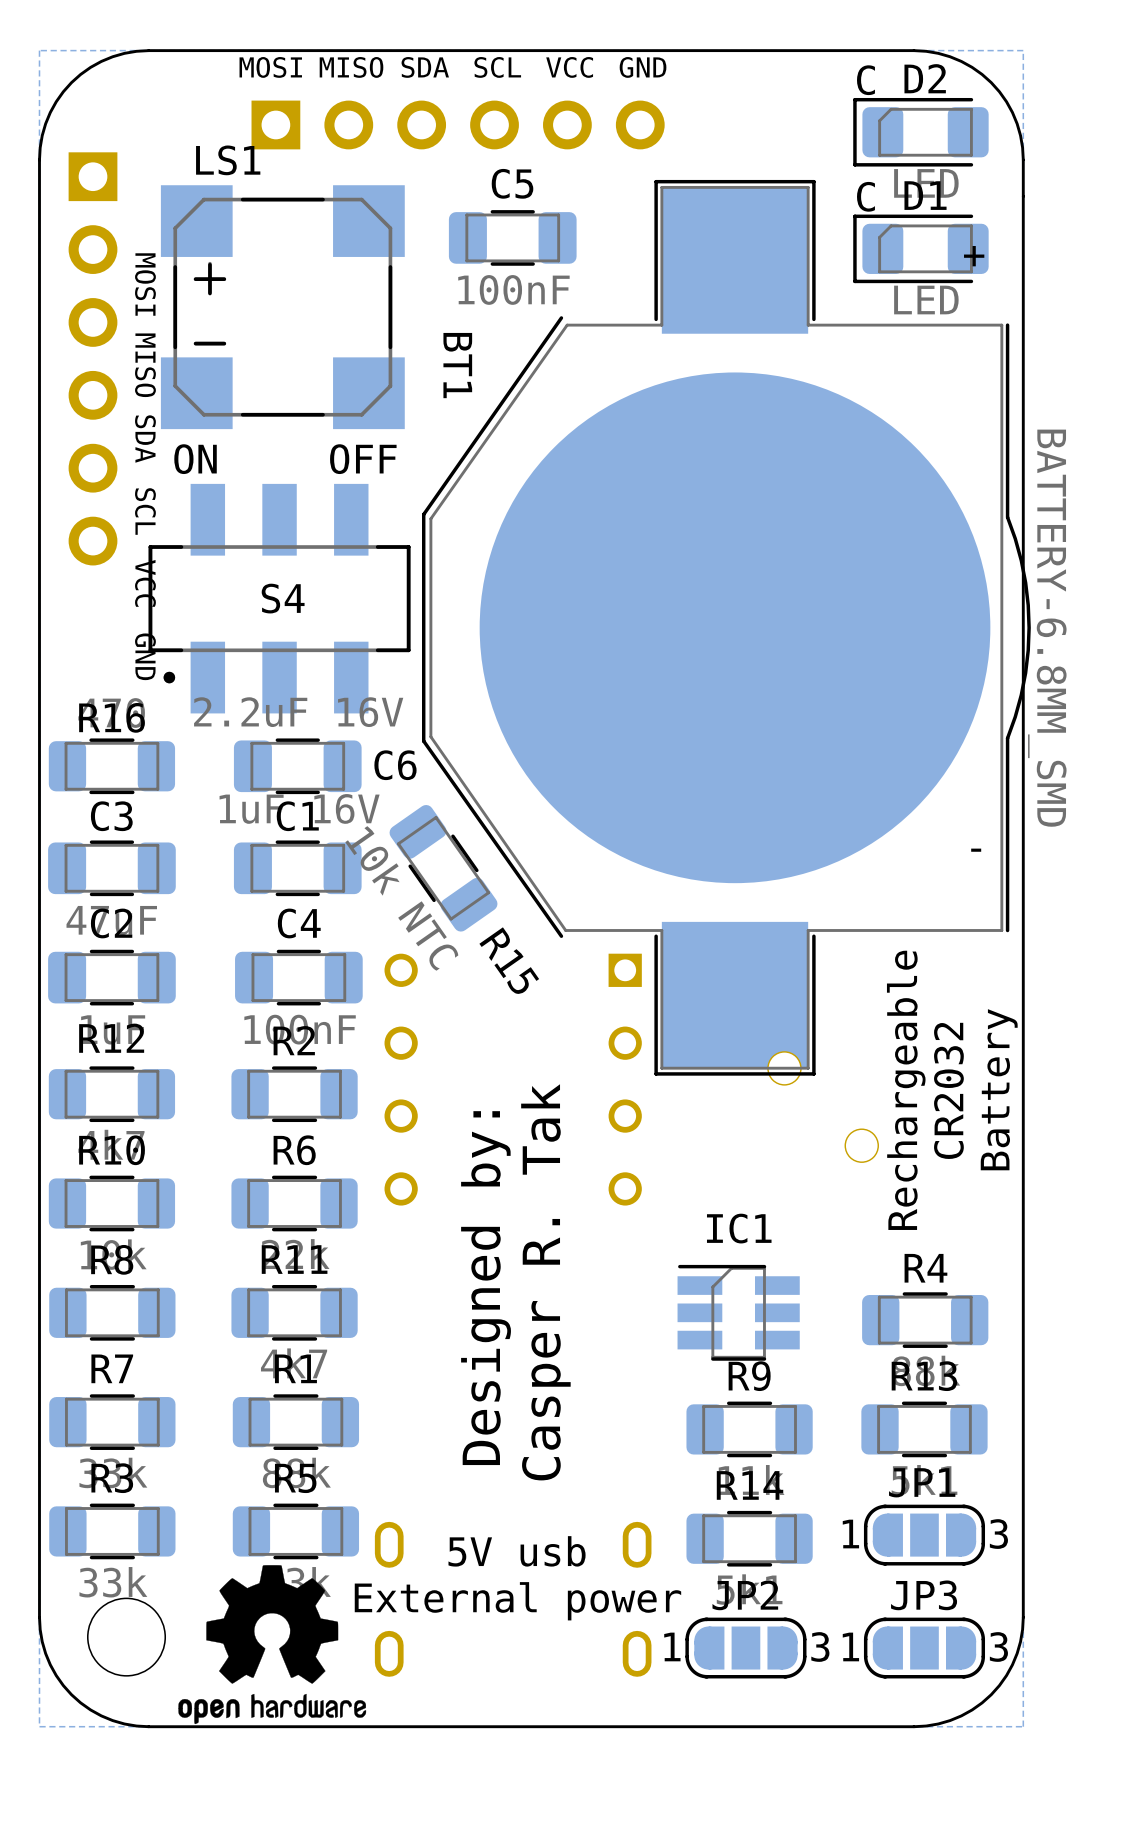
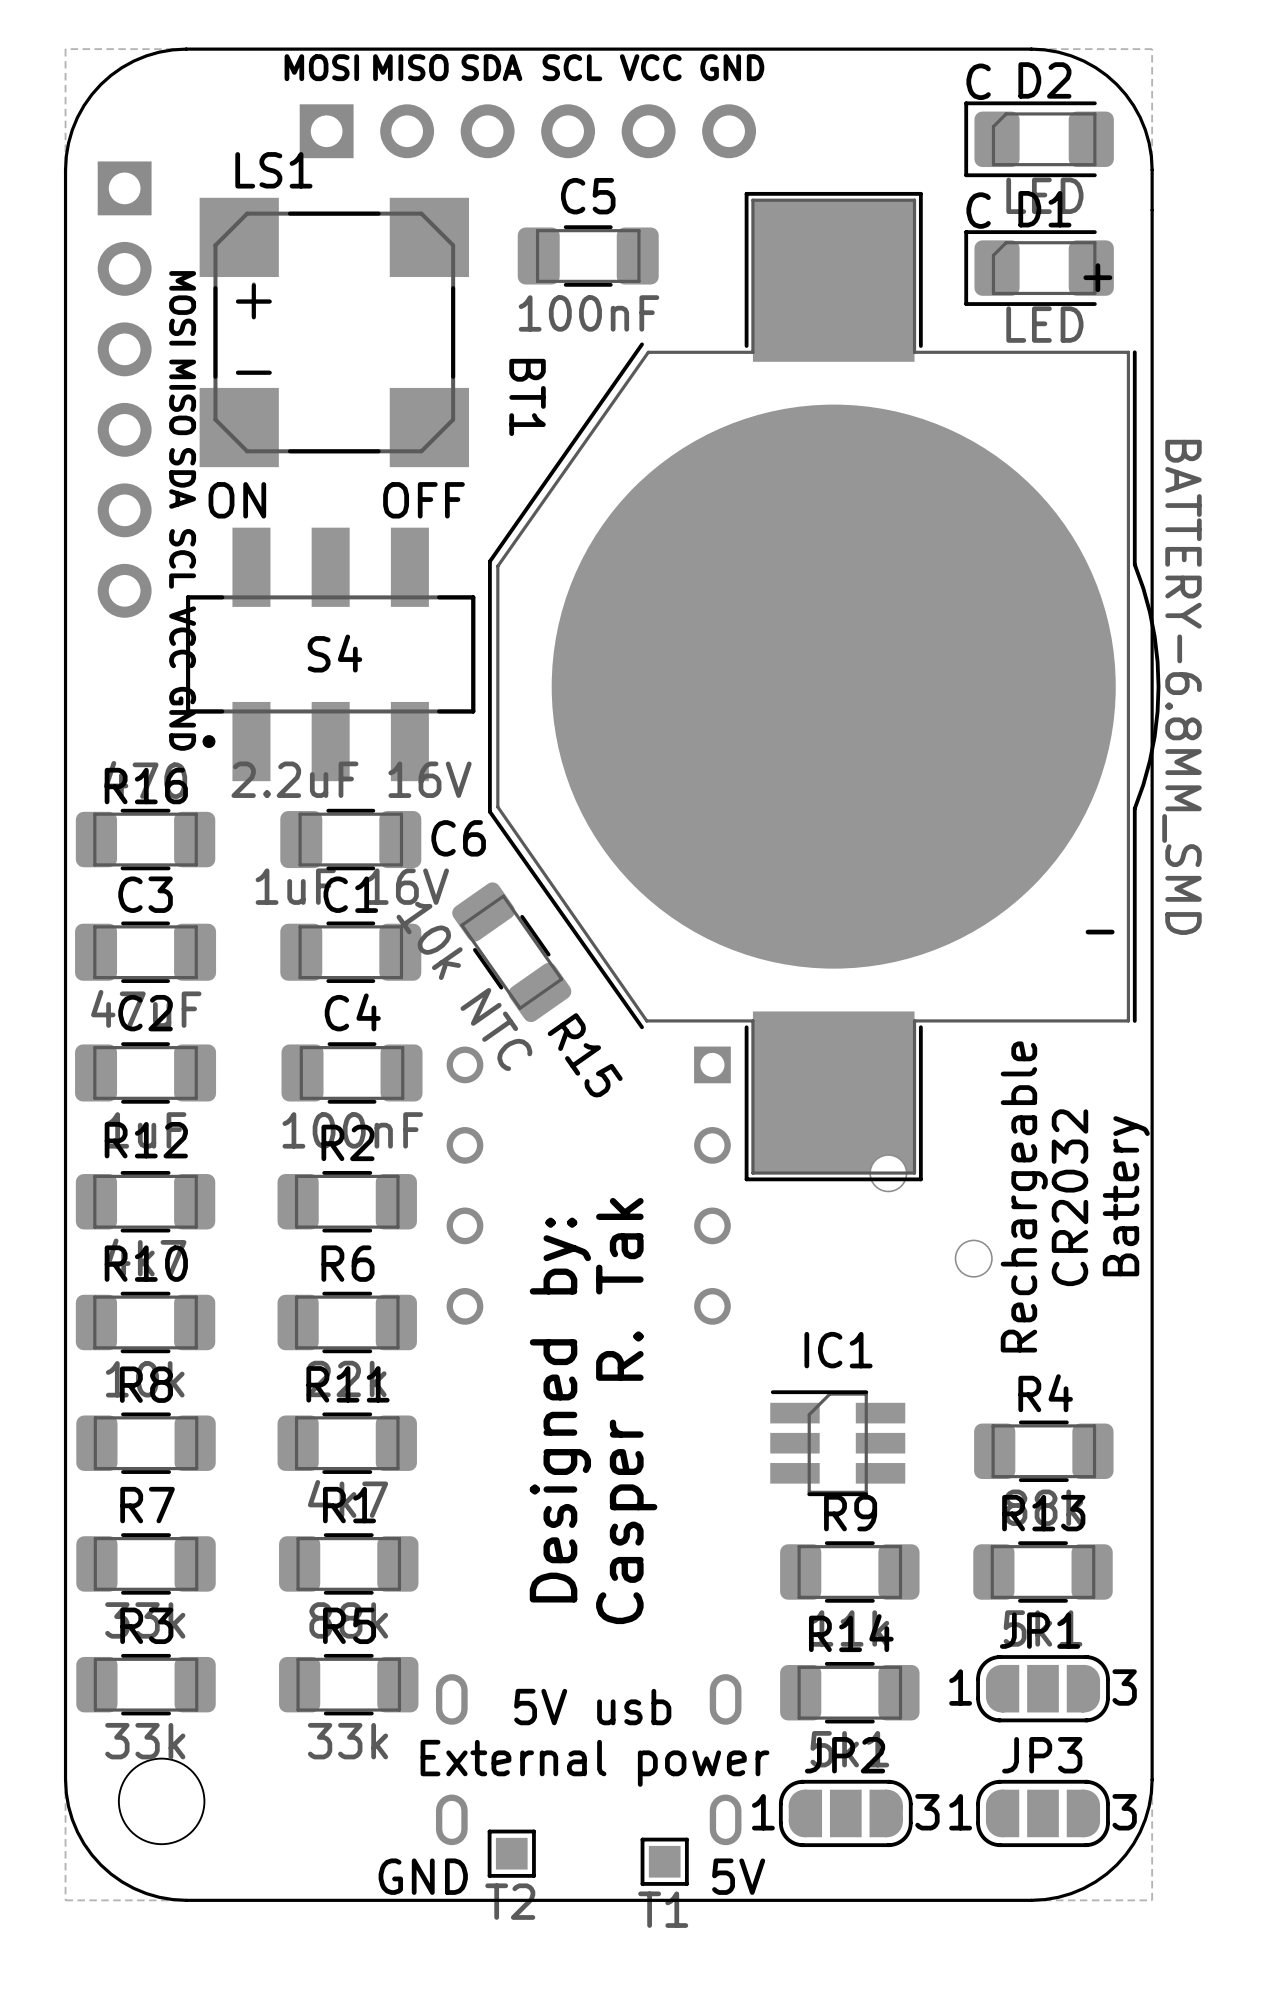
drawing: [178, 1565, 367, 1725] -> none
GND: none -> T2 (511, 1853)
5V: none -> T1 (664, 1861)

